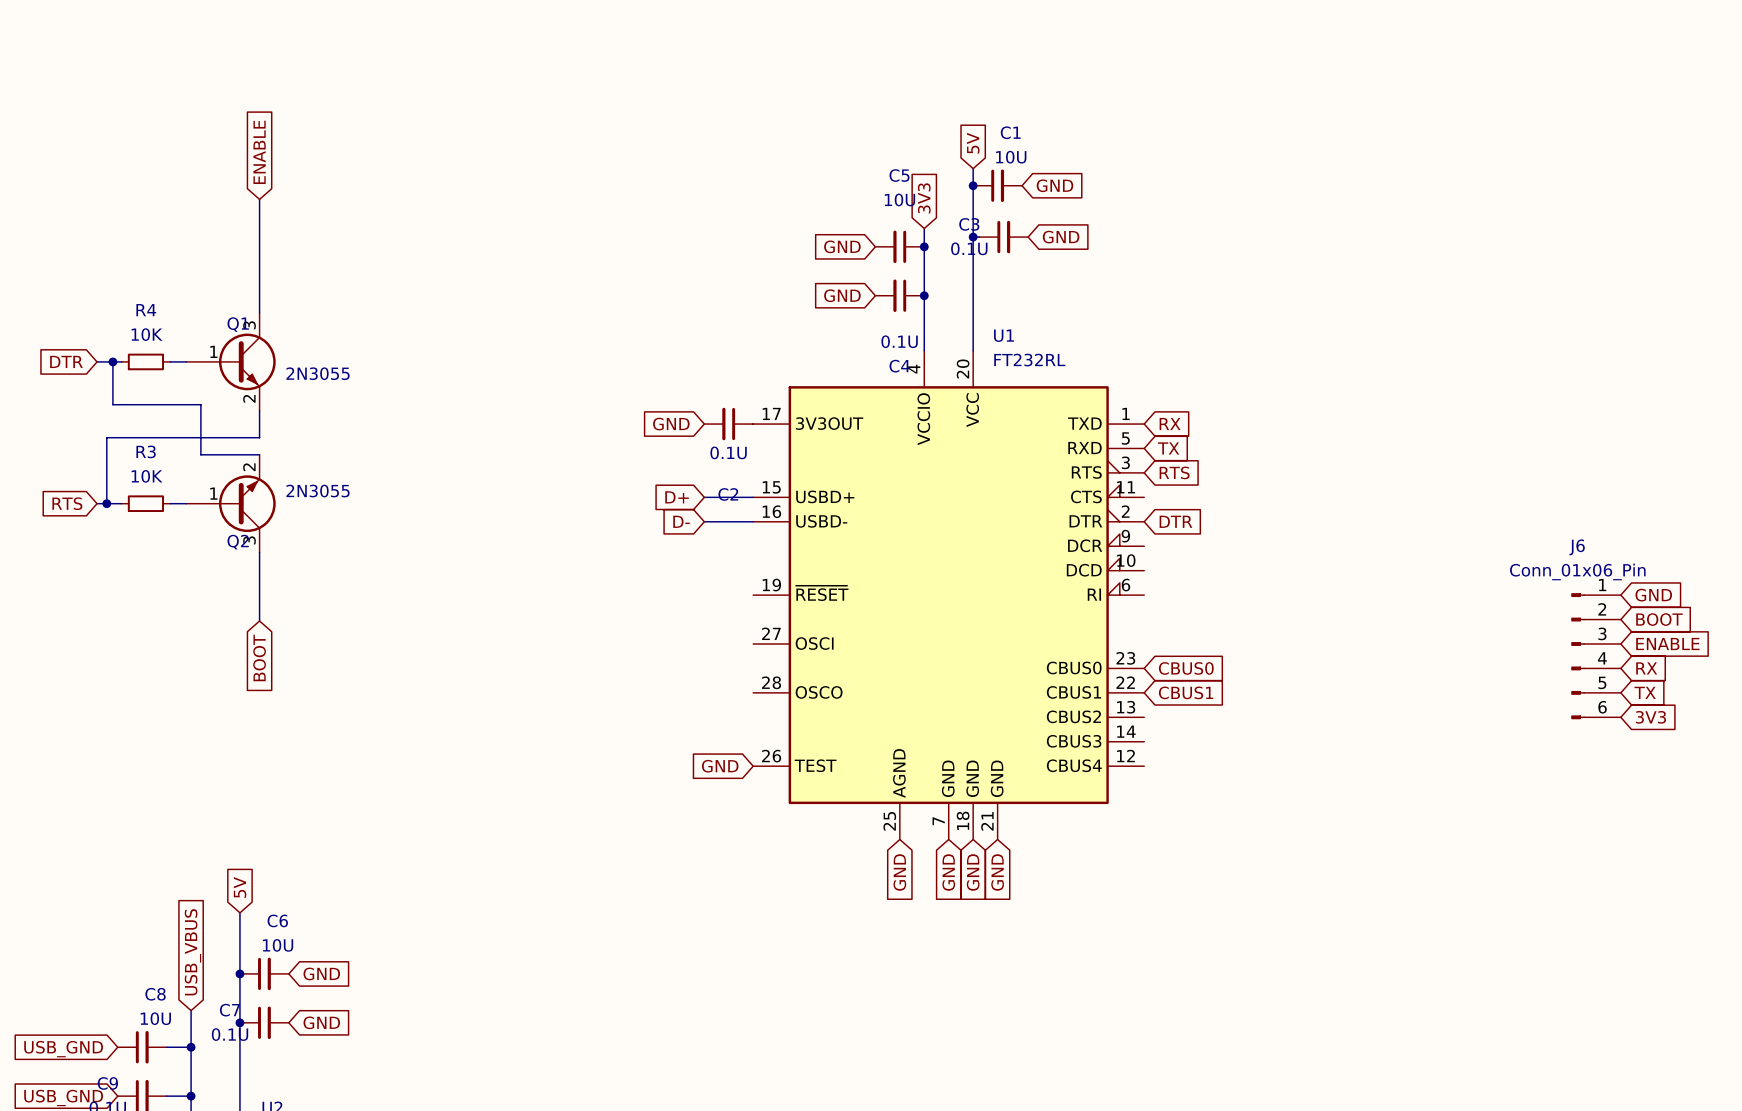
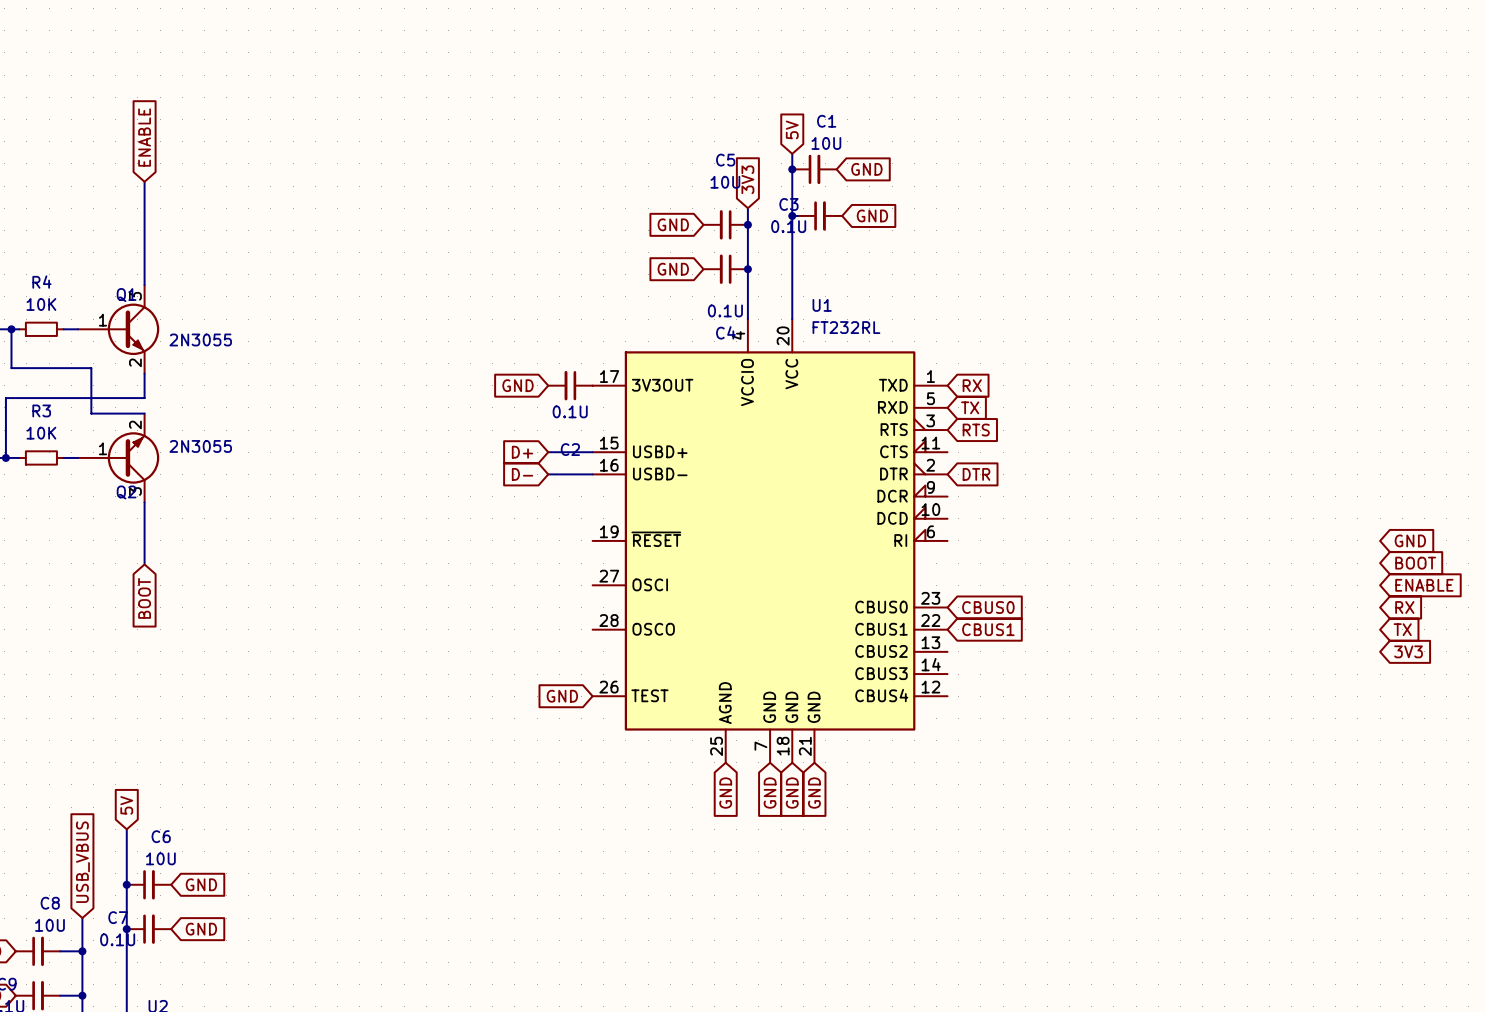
J6: Conn_01x06_Pin (1596, 656) -> none

